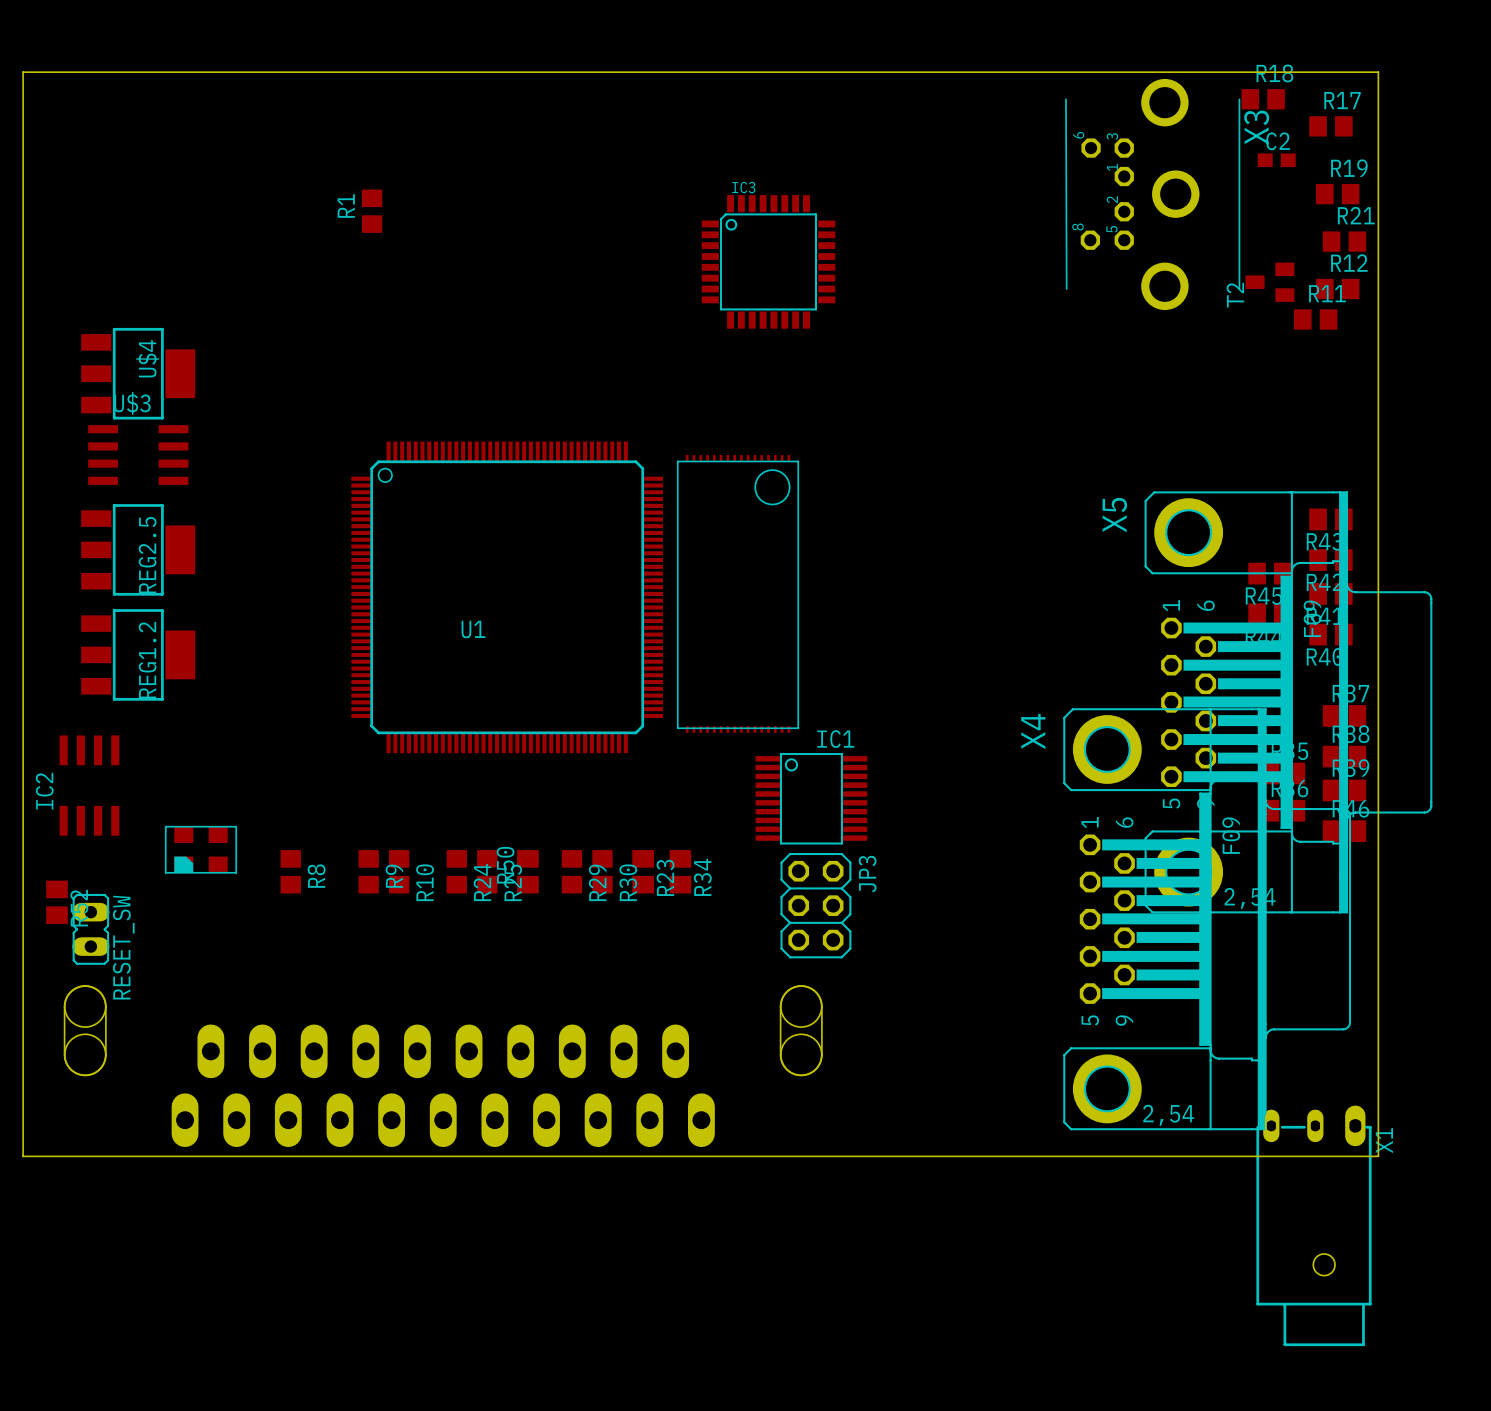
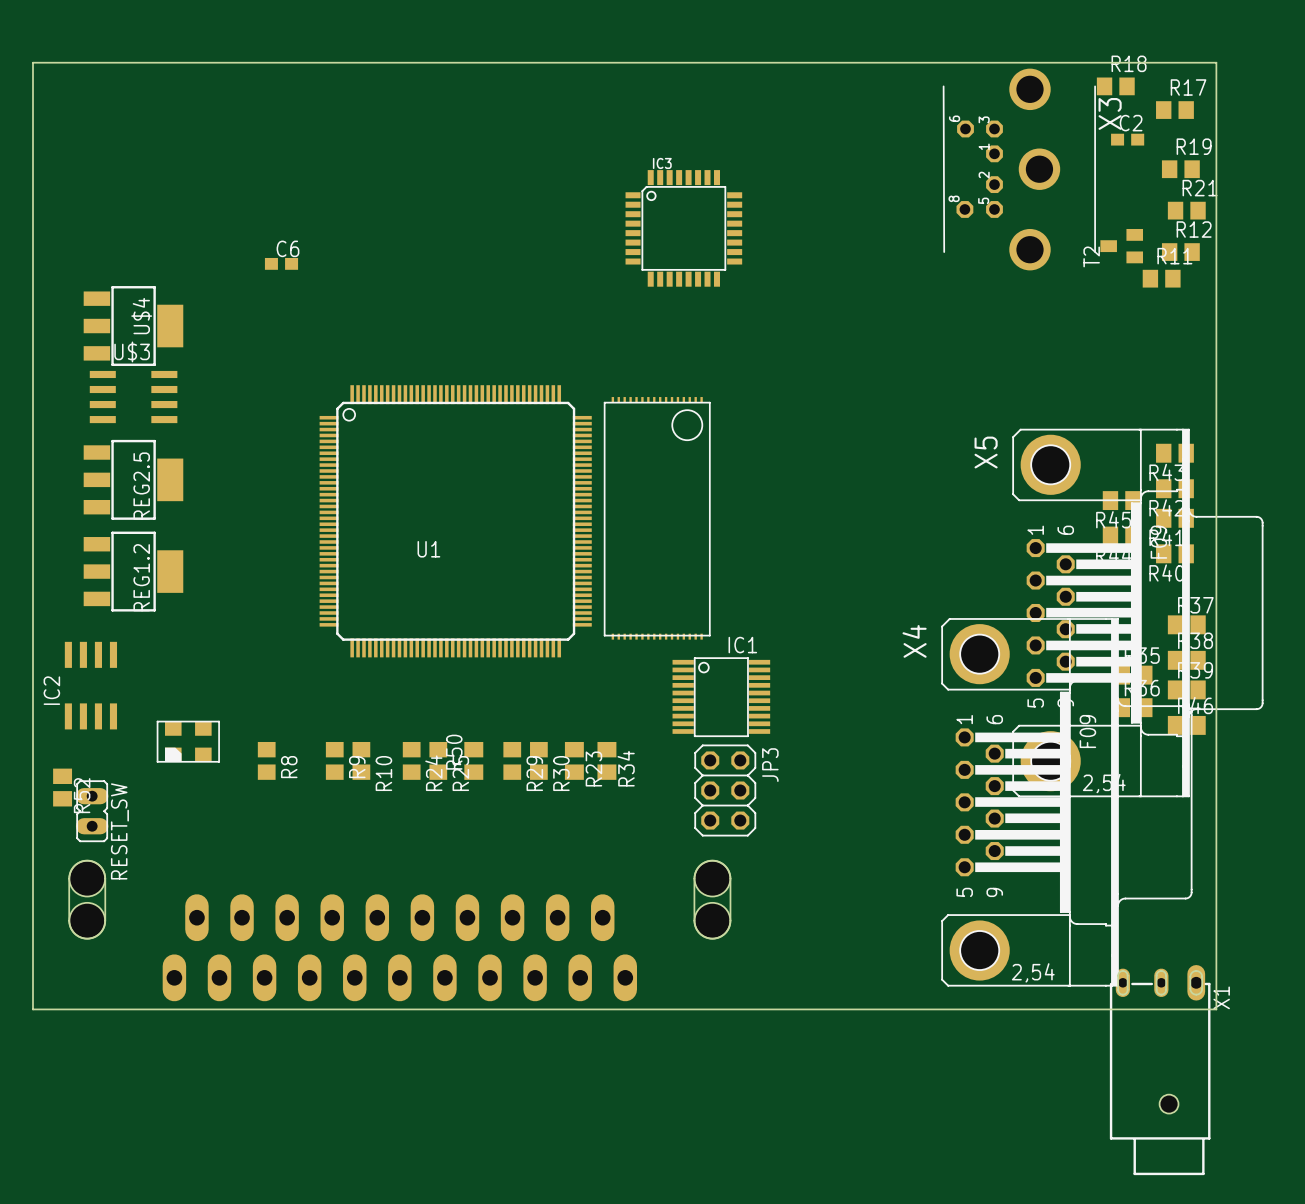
R1: (372, 211) -> none
C6: none -> (281, 263)

